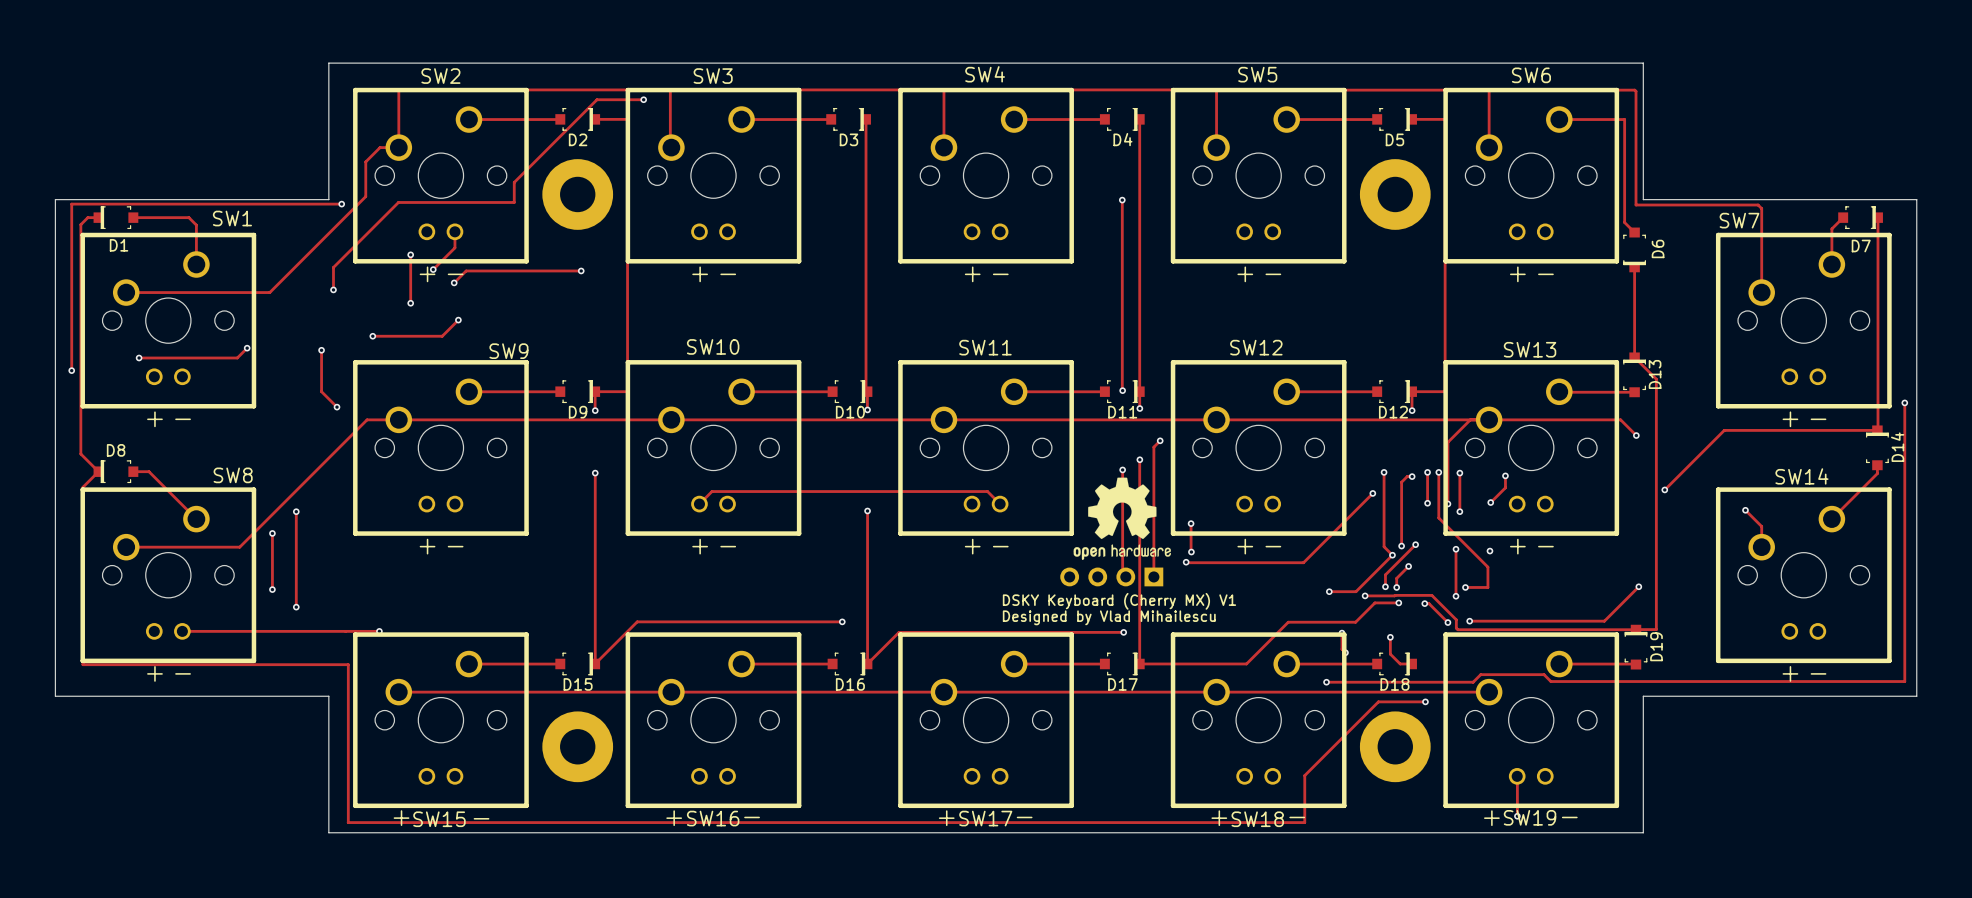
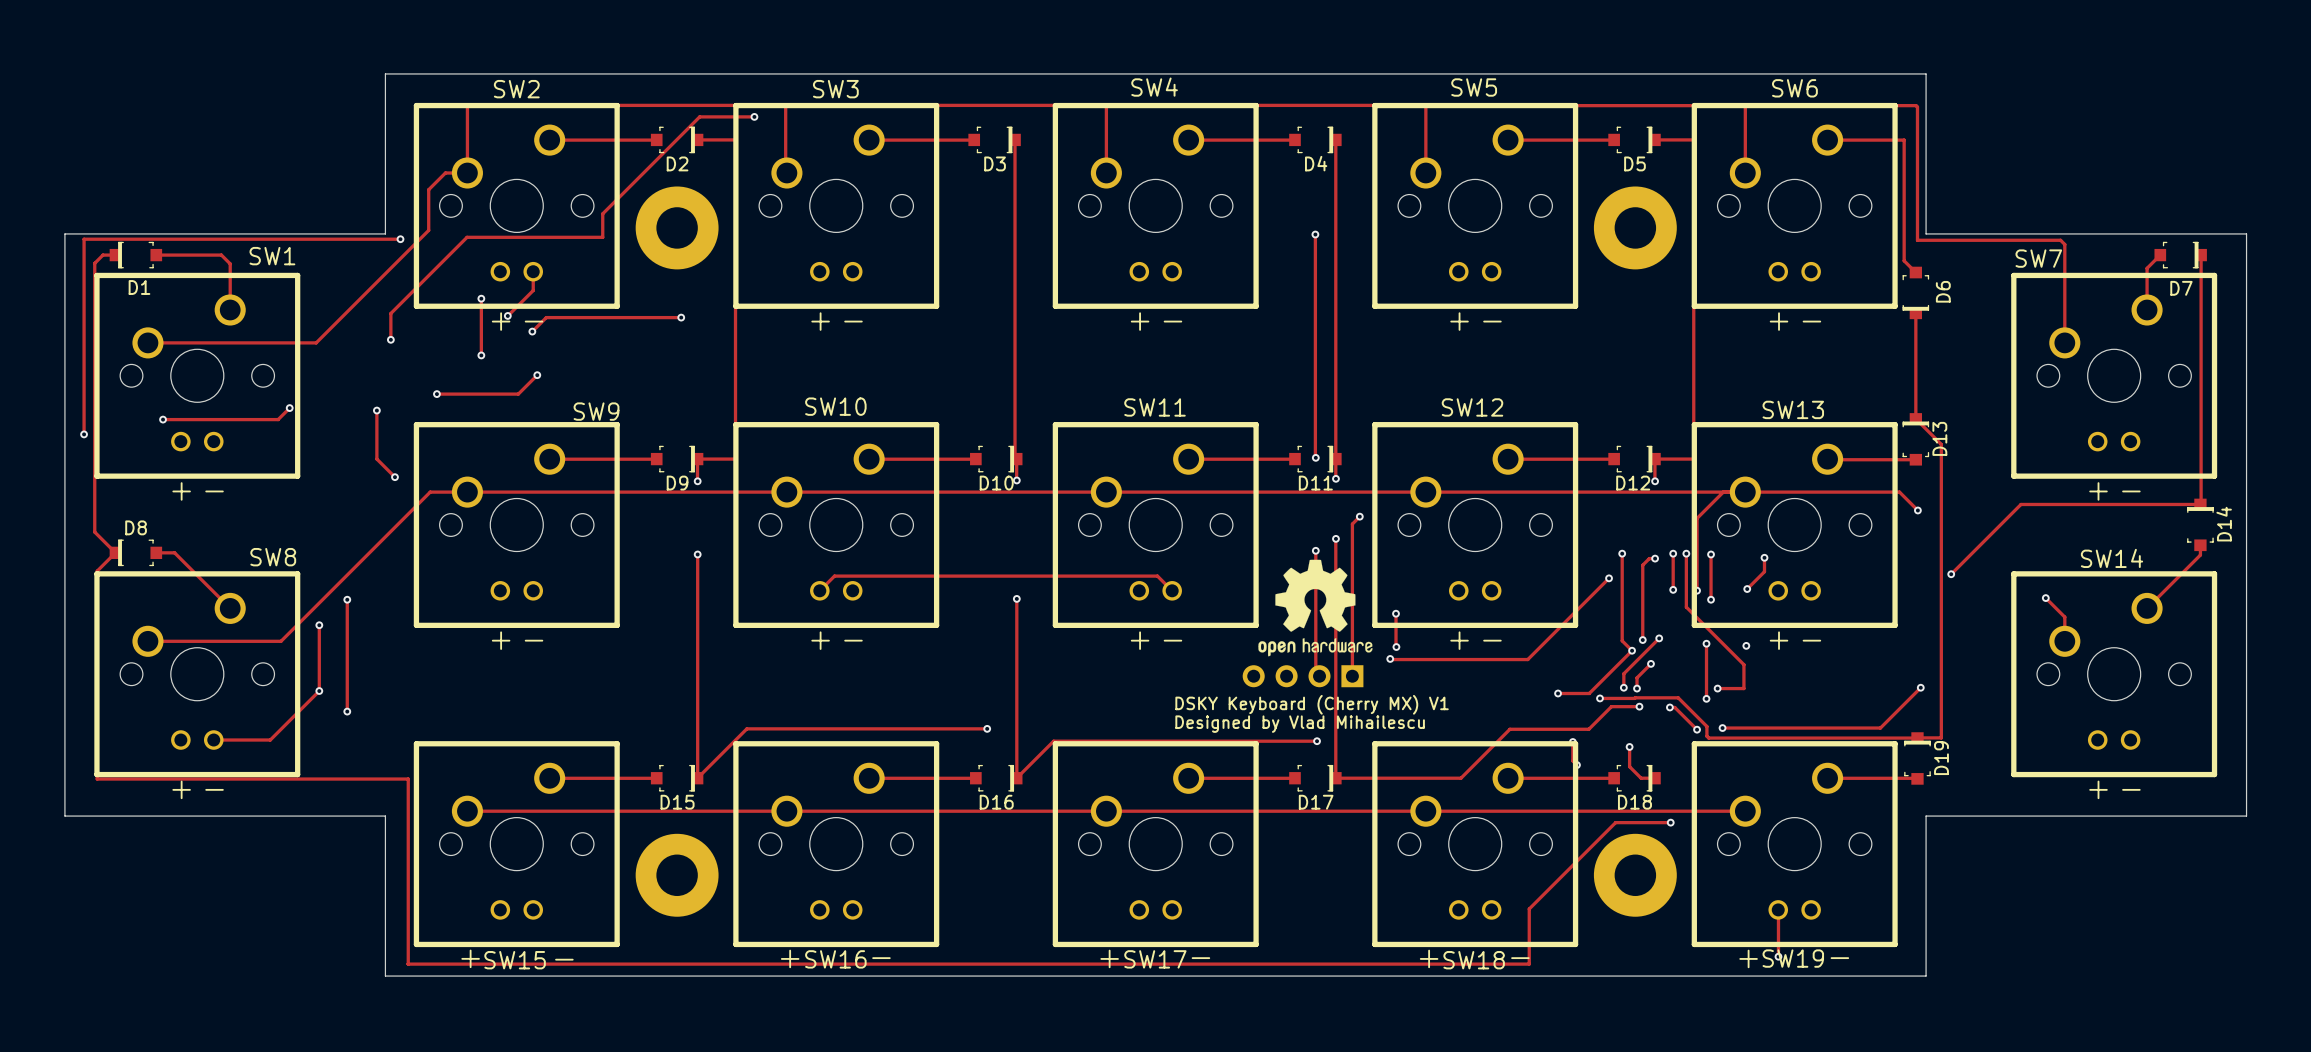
track: (1904, 402) (1904, 681) (1550, 681) (1544, 674) (1480, 674) (1473, 682) (1326, 682) -> none
via: (1904, 402) -> none
track: (230, 631) (379, 631) -> (270, 740) (319, 691)
via: (379, 631) -> none
via: (1326, 682) -> none

